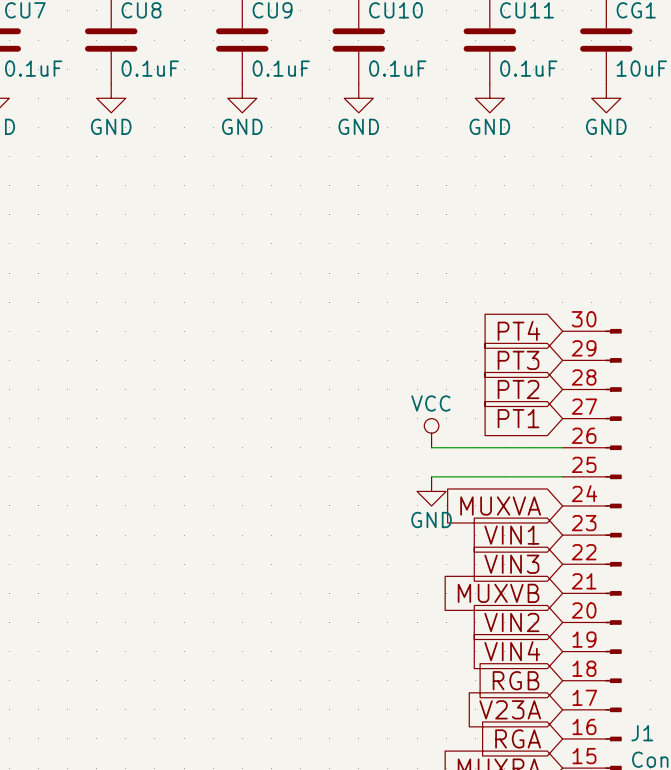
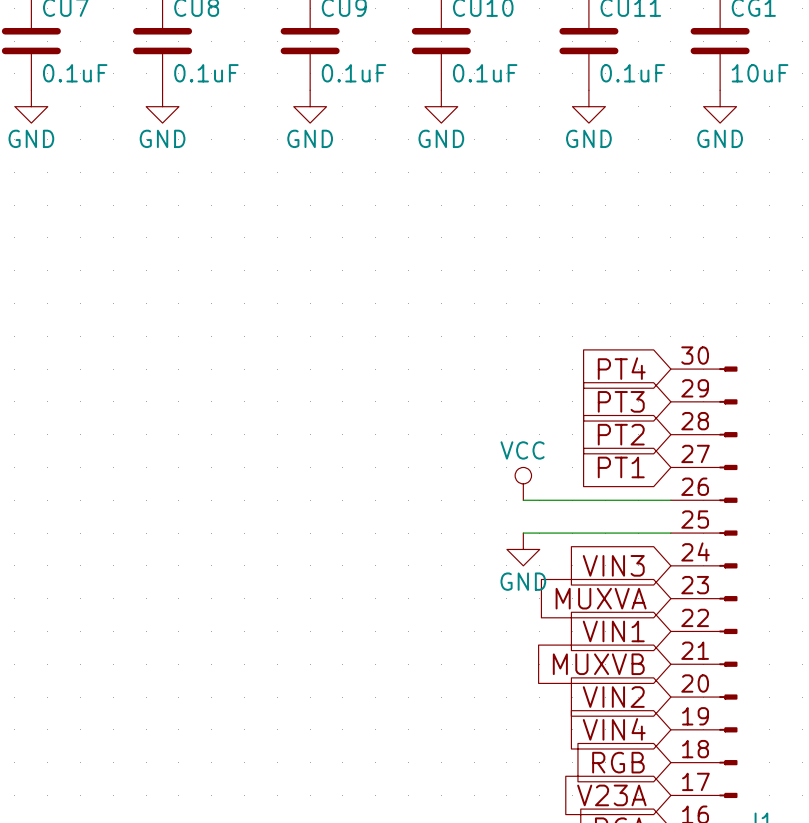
global label: MUXVA (500, 505) -> VIN3 (613, 565)
global label: VIN1 (511, 535) -> MUXVA (601, 598)
global label: VIN3 (511, 564) -> VIN1 (613, 631)

